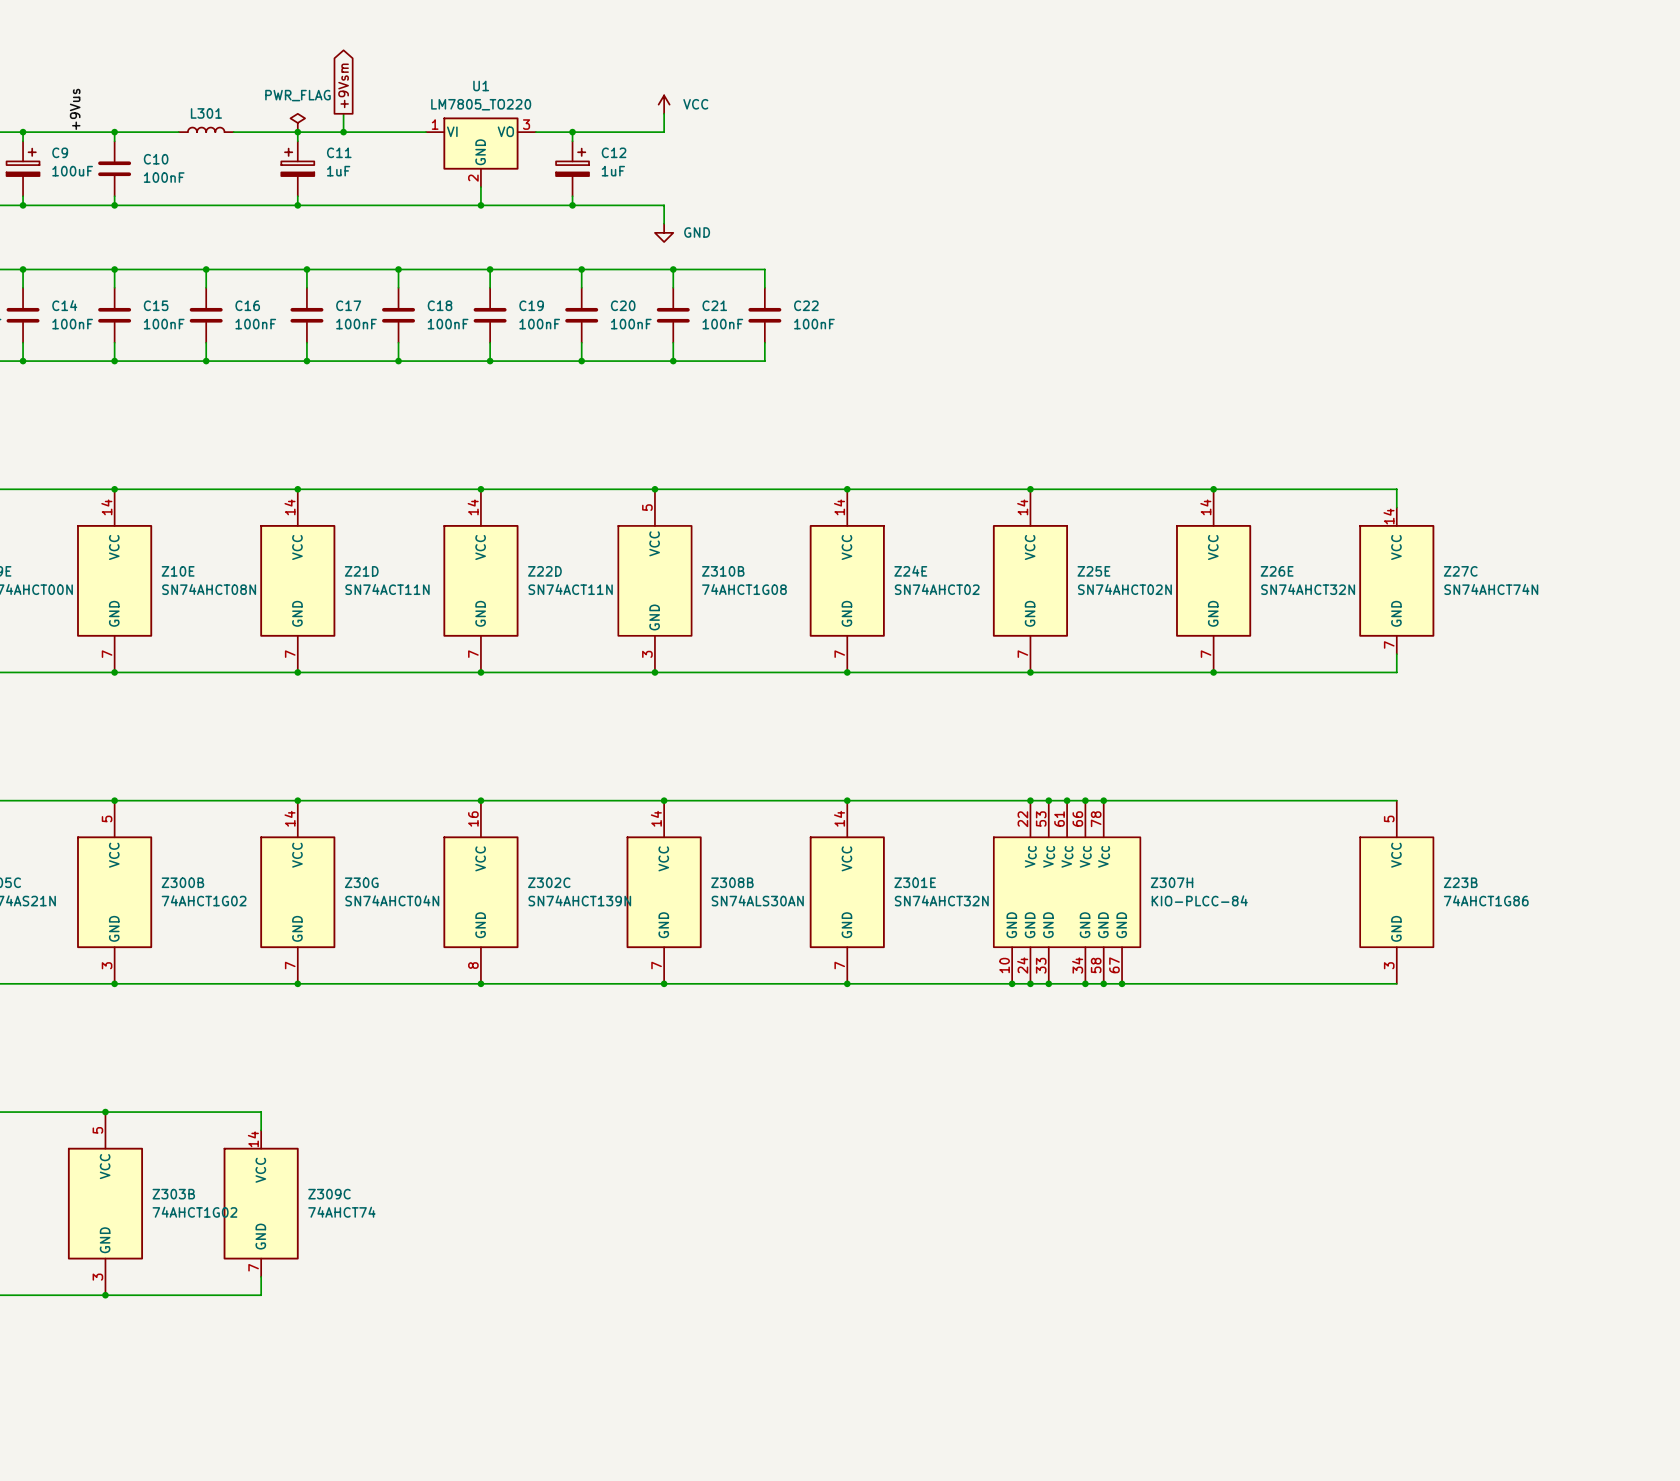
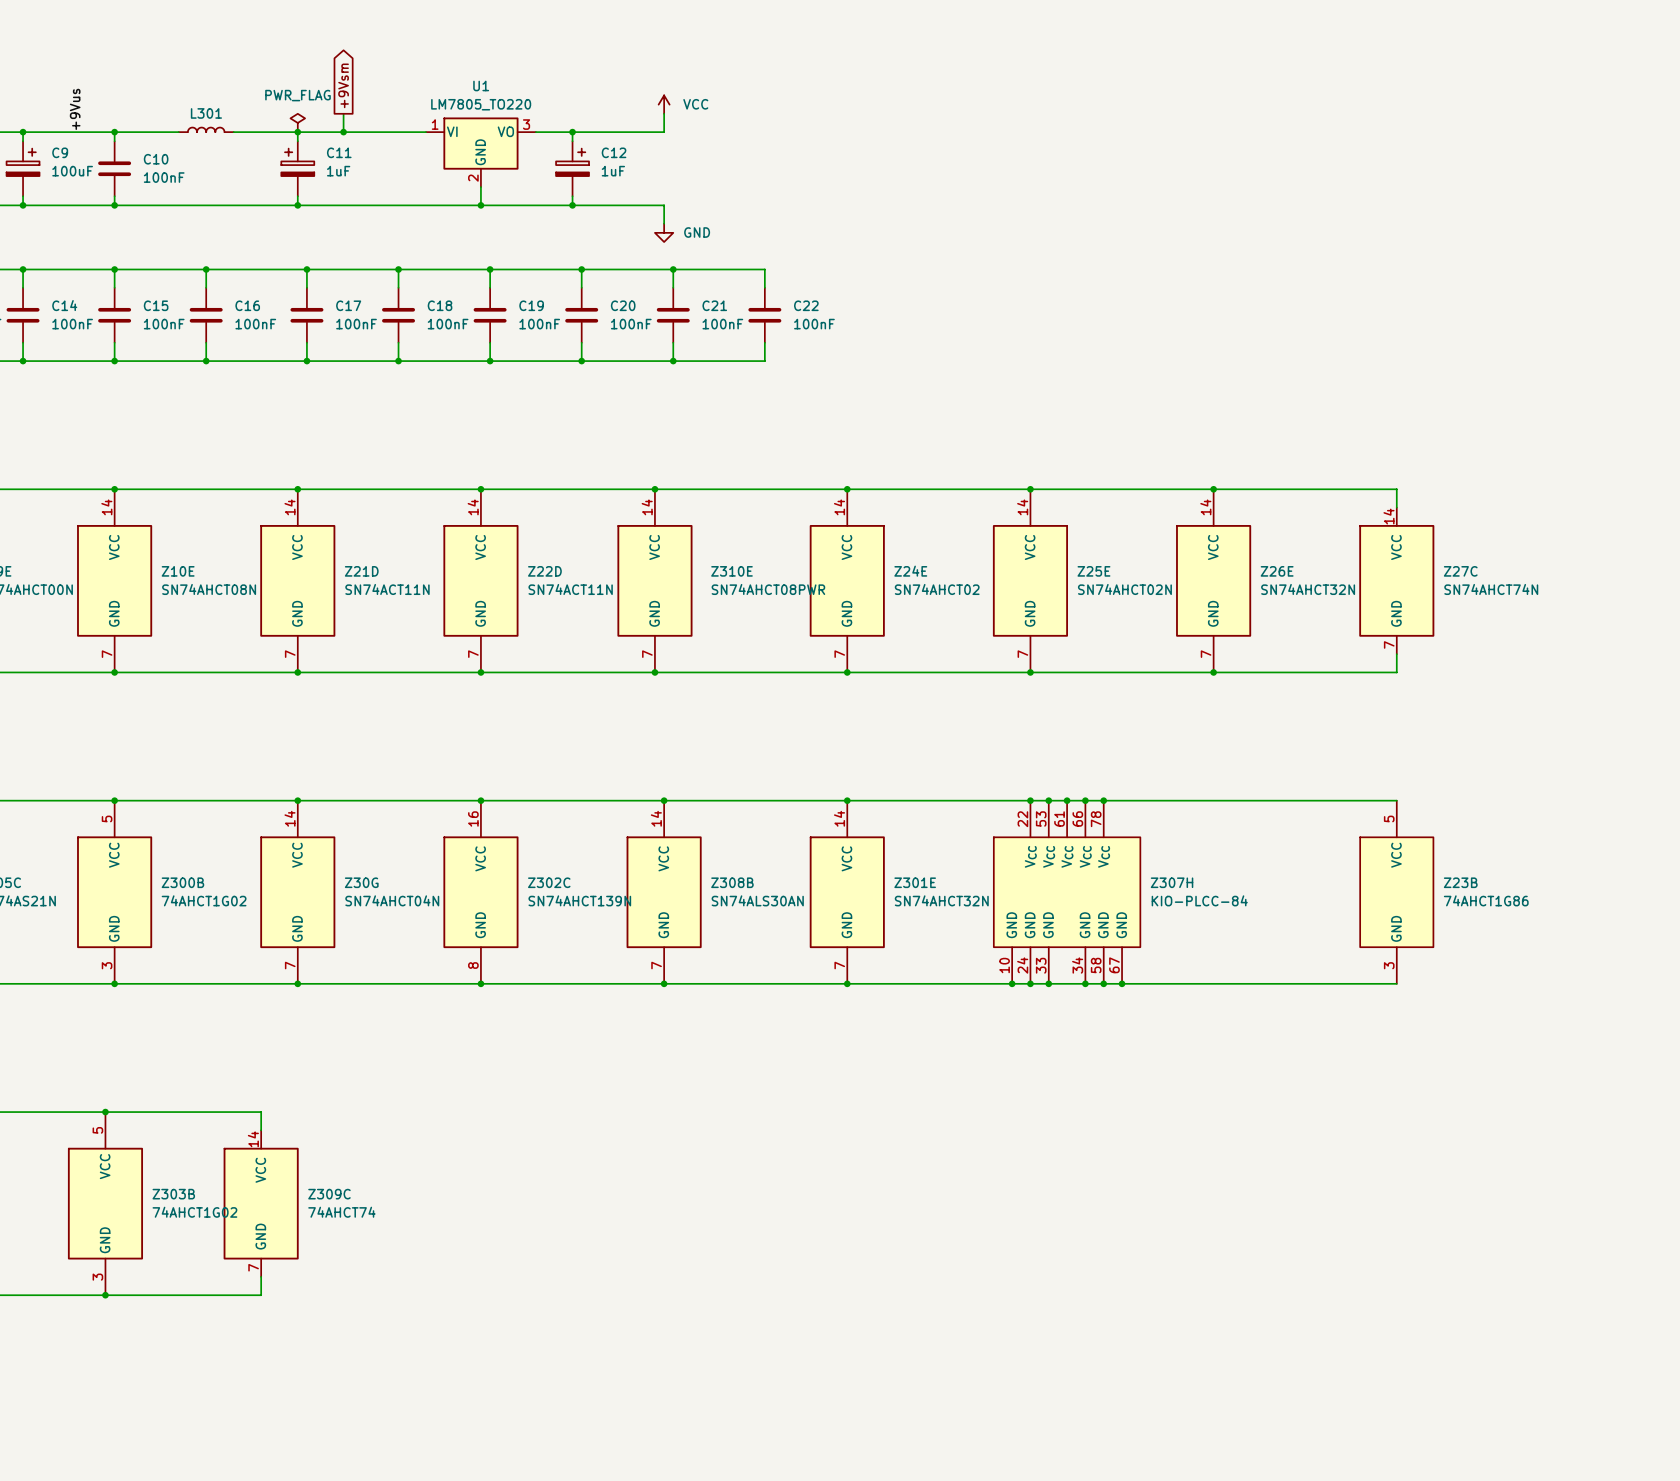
Z310B: 74AHCT1G08 (654, 580) -> none
Z310E: none -> SN74AHCT08PWR (654, 580)

